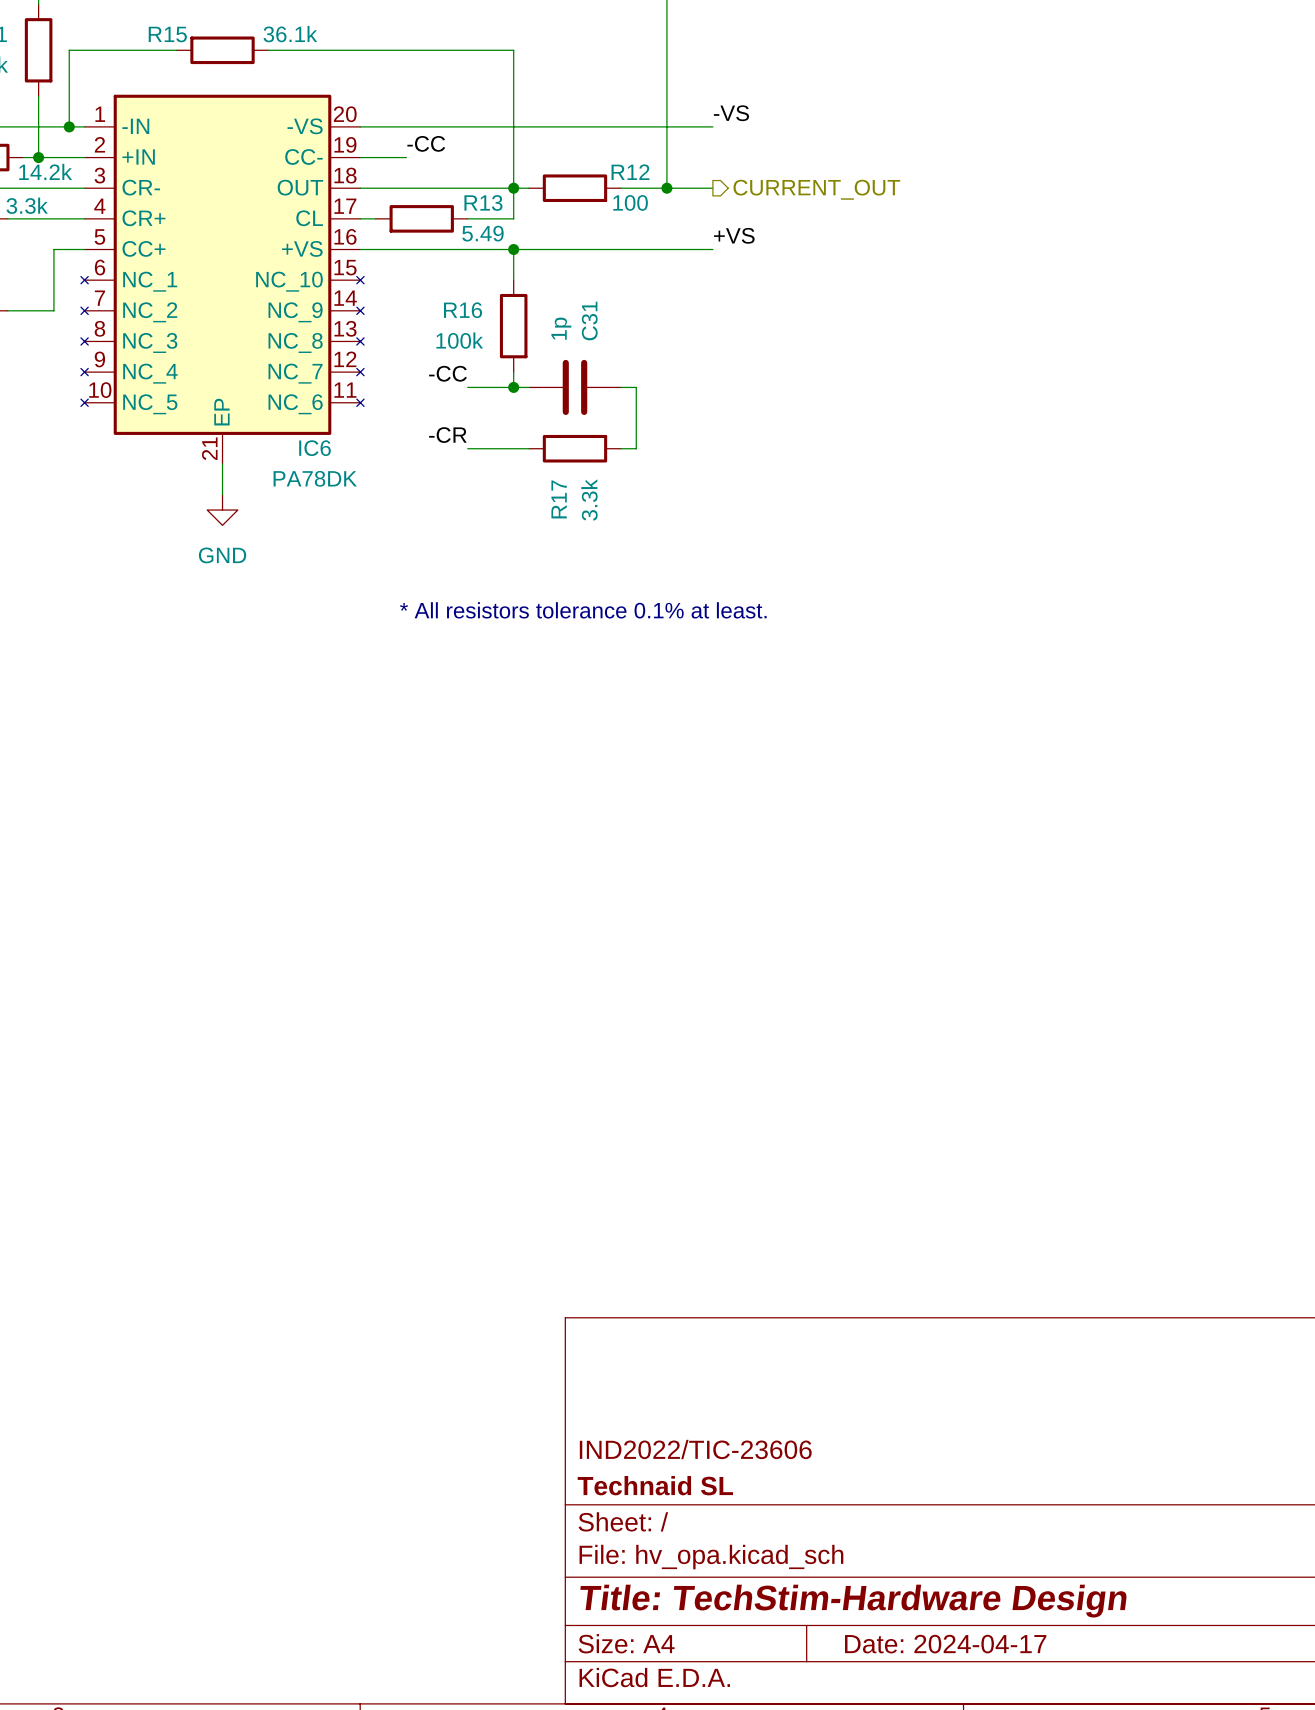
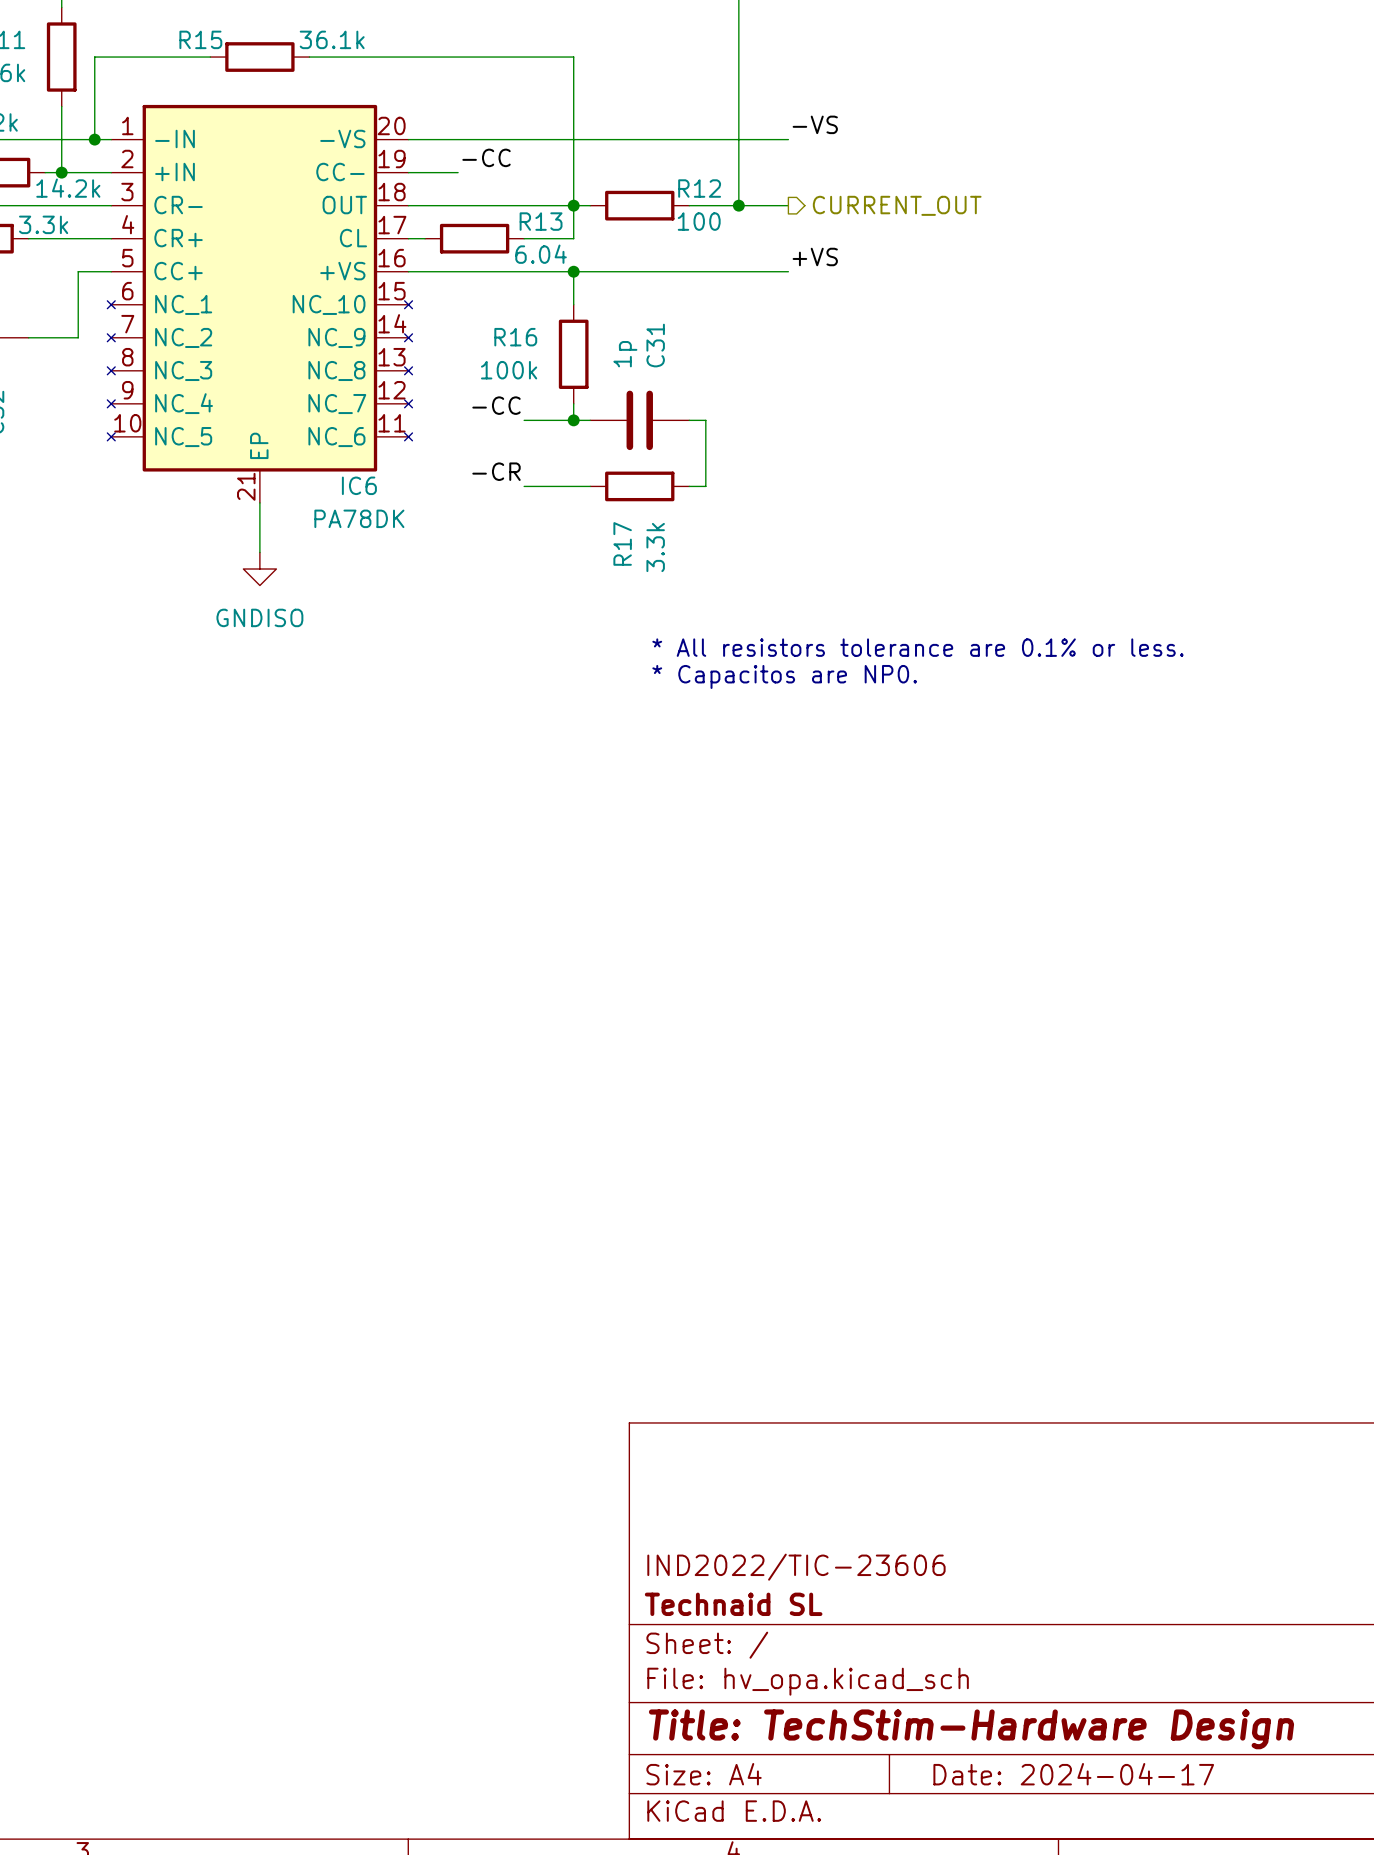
R13 value: 5.49 (482, 233) -> 6.04 (541, 254)
power symbol: GND (222, 510) -> none
power symbol: none -> GNDISO (259, 569)
text: * All resistors tolerance 0.1% at least. (583, 610) -> * All resistors tolerance are 0.1% or less. (917, 647)
text: none -> * Capacitos are NP0. (784, 676)

